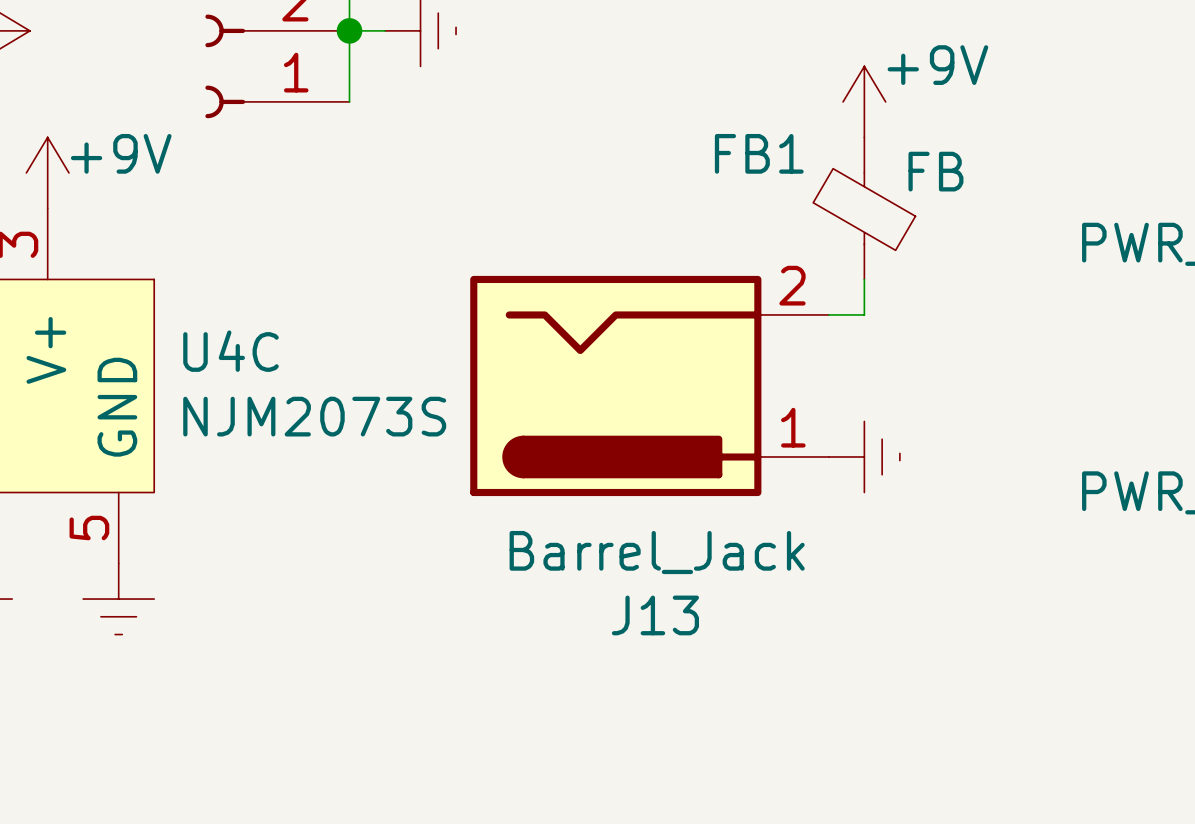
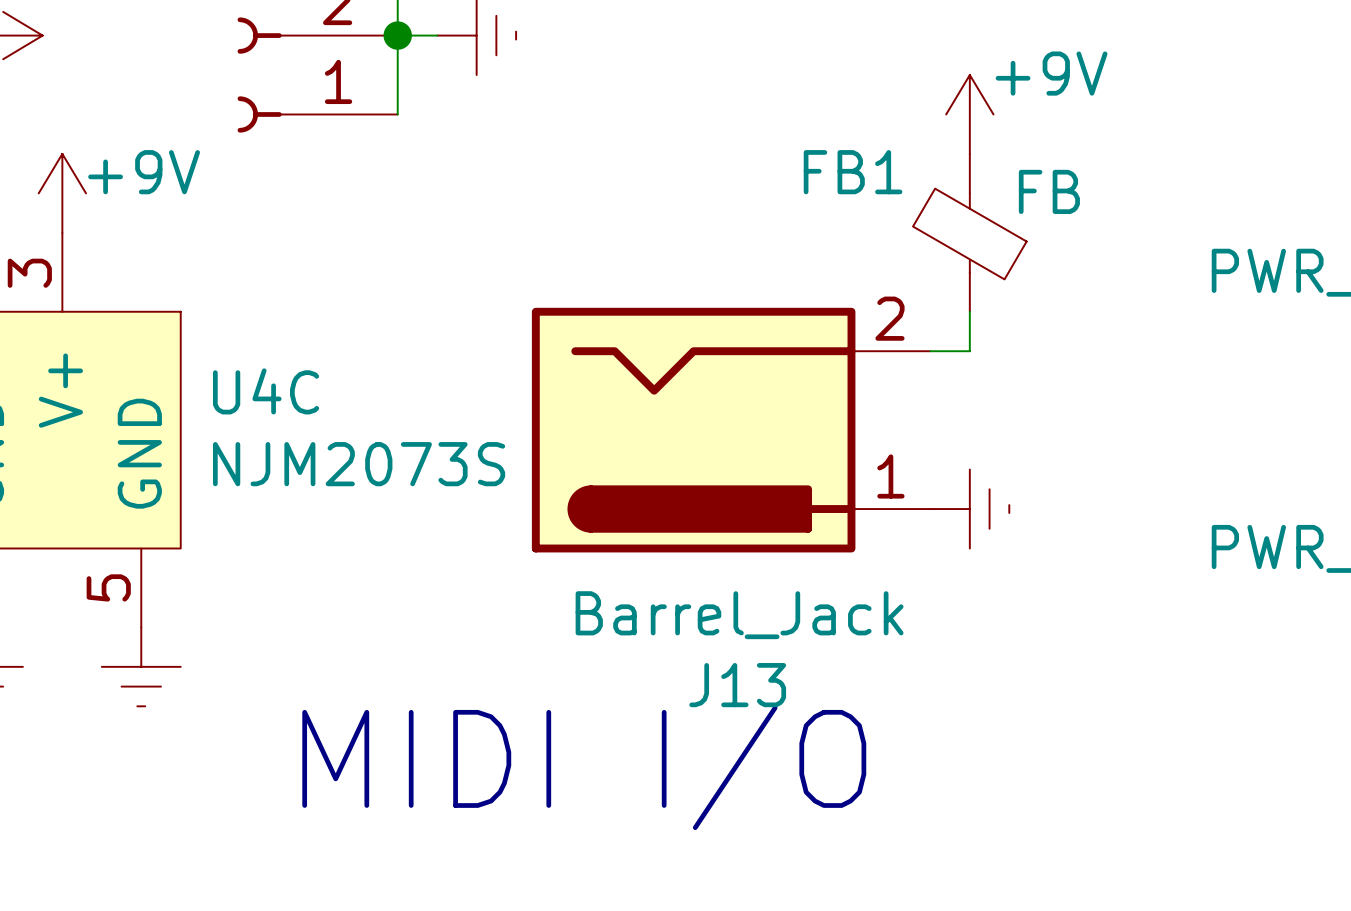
text: none -> MIDI I/O (584, 767)

